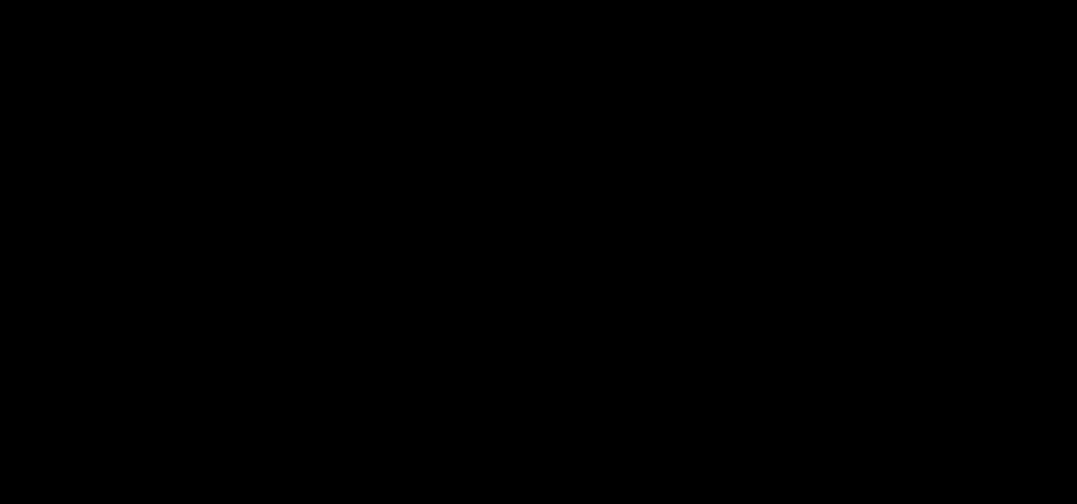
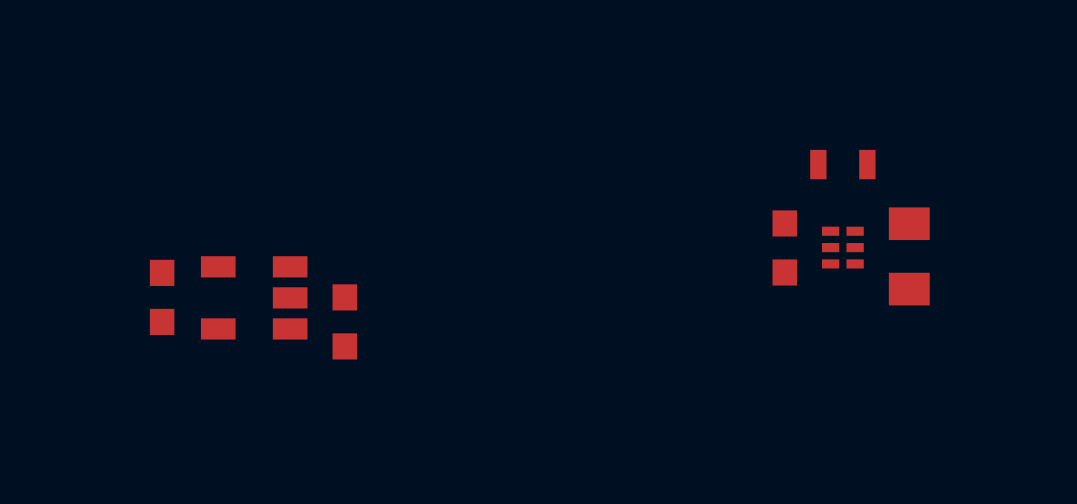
part: none -> (842, 164)
part: none -> (784, 247)
part: none -> (842, 247)
part: none -> (909, 256)
part: none -> (162, 297)
part: none -> (254, 297)
part: none -> (344, 321)

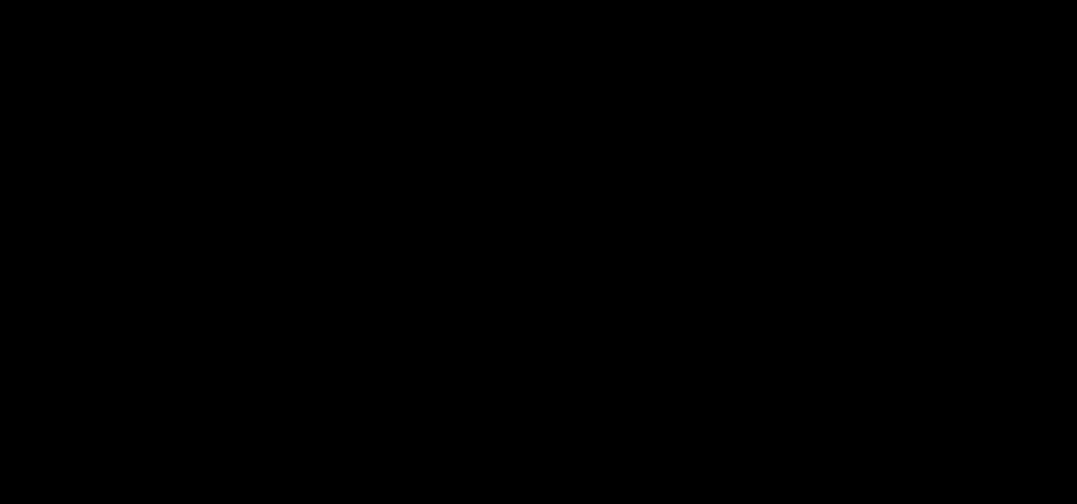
part: (842, 164) -> none
part: (784, 247) -> none
part: (842, 247) -> none
part: (909, 256) -> none
part: (162, 297) -> none
part: (254, 297) -> none
part: (344, 321) -> none

